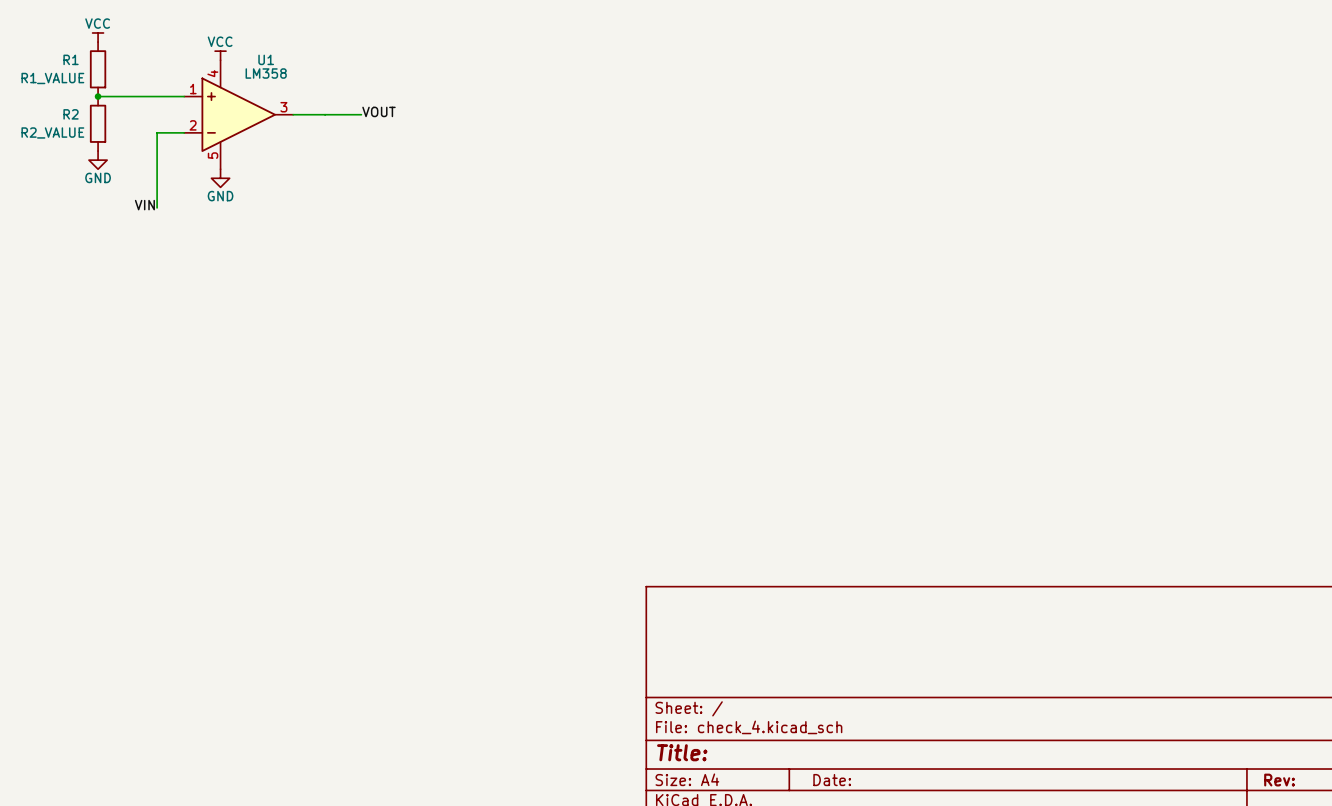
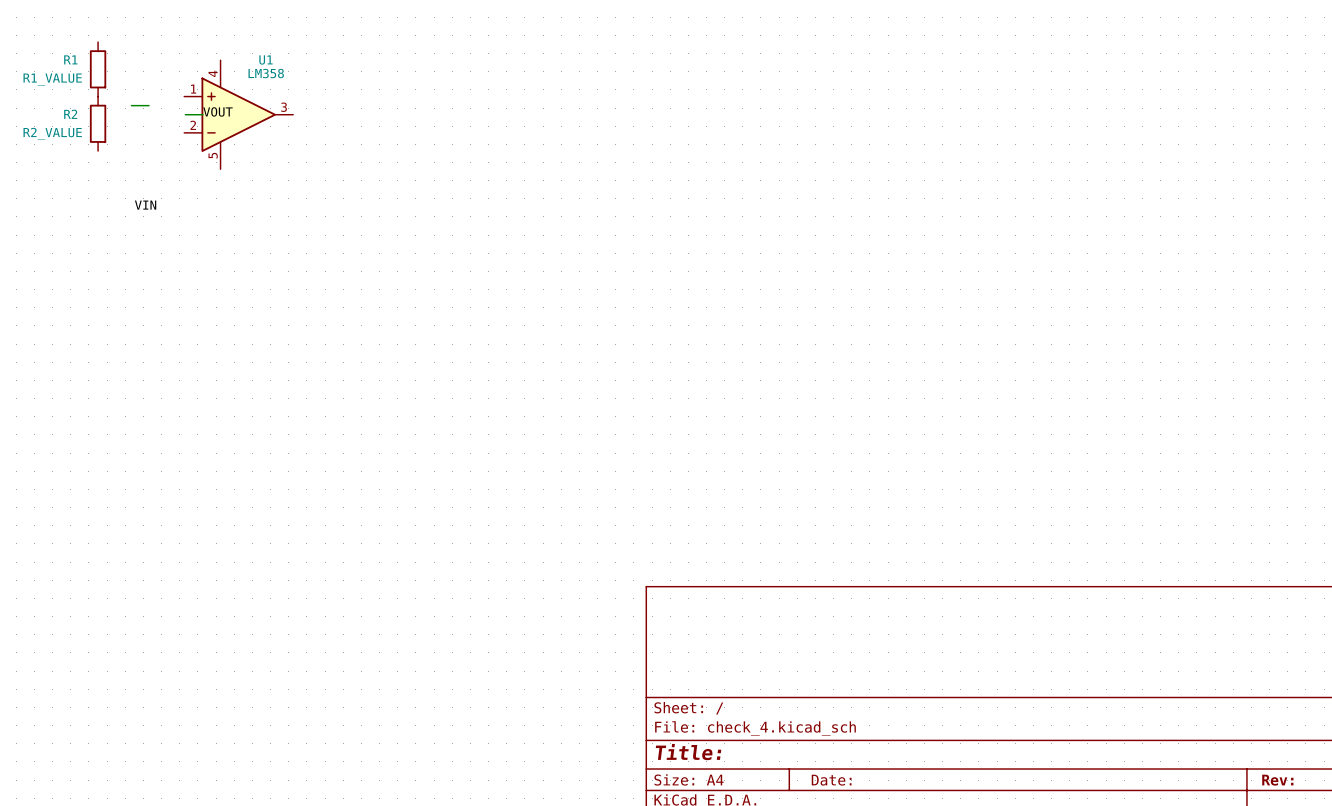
power symbol: VCC (98, 37) -> none
power symbol: VCC (220, 55) -> none
wire: (98, 96) (184, 96) -> none
junction: (98, 96) -> none
wire: none -> (131, 105) (149, 105)
label position: VOUT (379, 111) -> VOUT (217, 111)
wire: none -> (185, 114) (202, 114)
wire: (293, 114) (361, 114) -> none
wire: (184, 132) (157, 132) (157, 207) -> none
power symbol: GND (98, 160) -> none
power symbol: GND (220, 178) -> none

